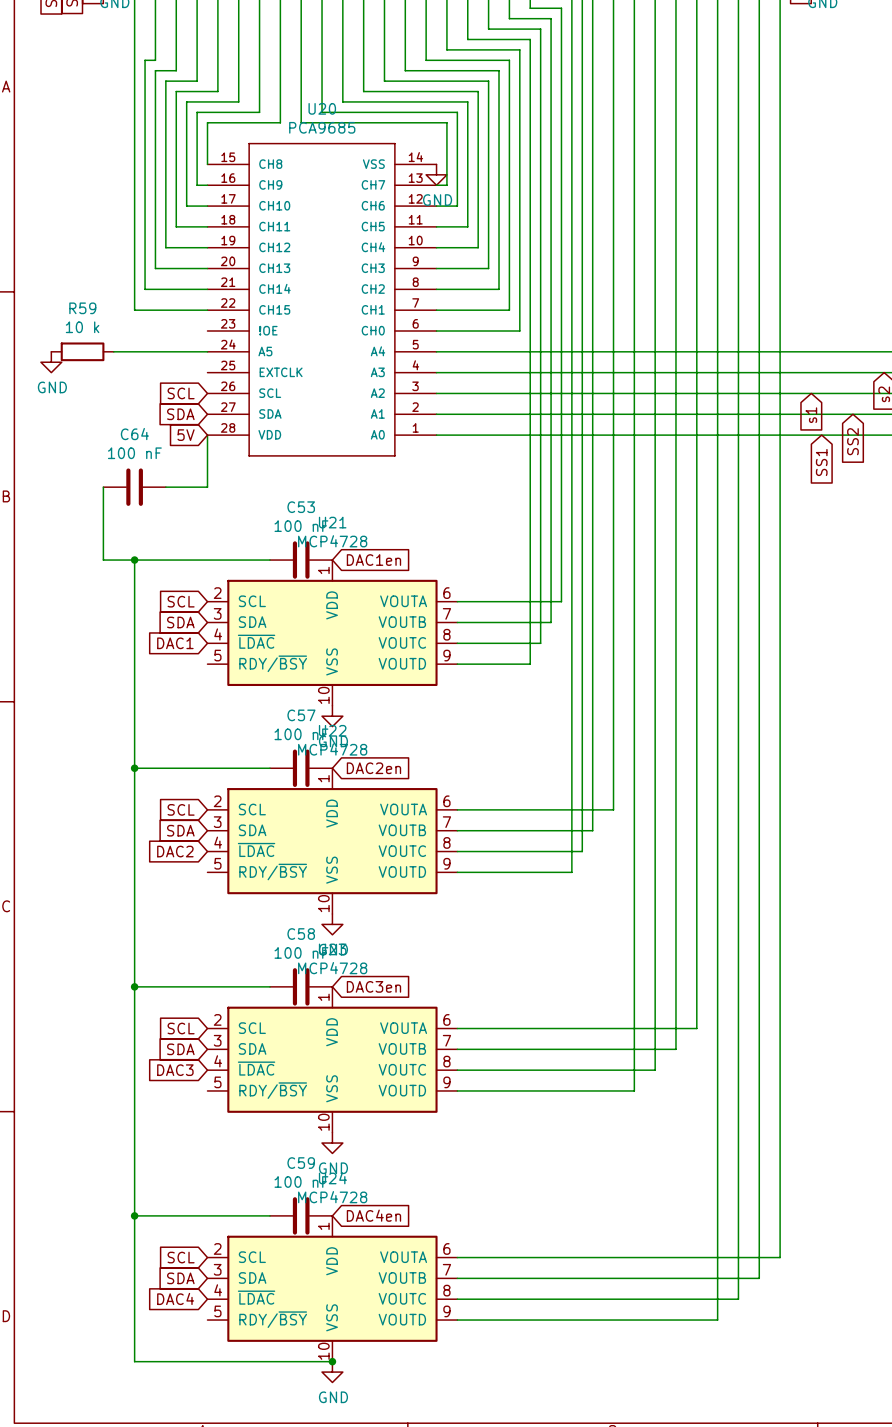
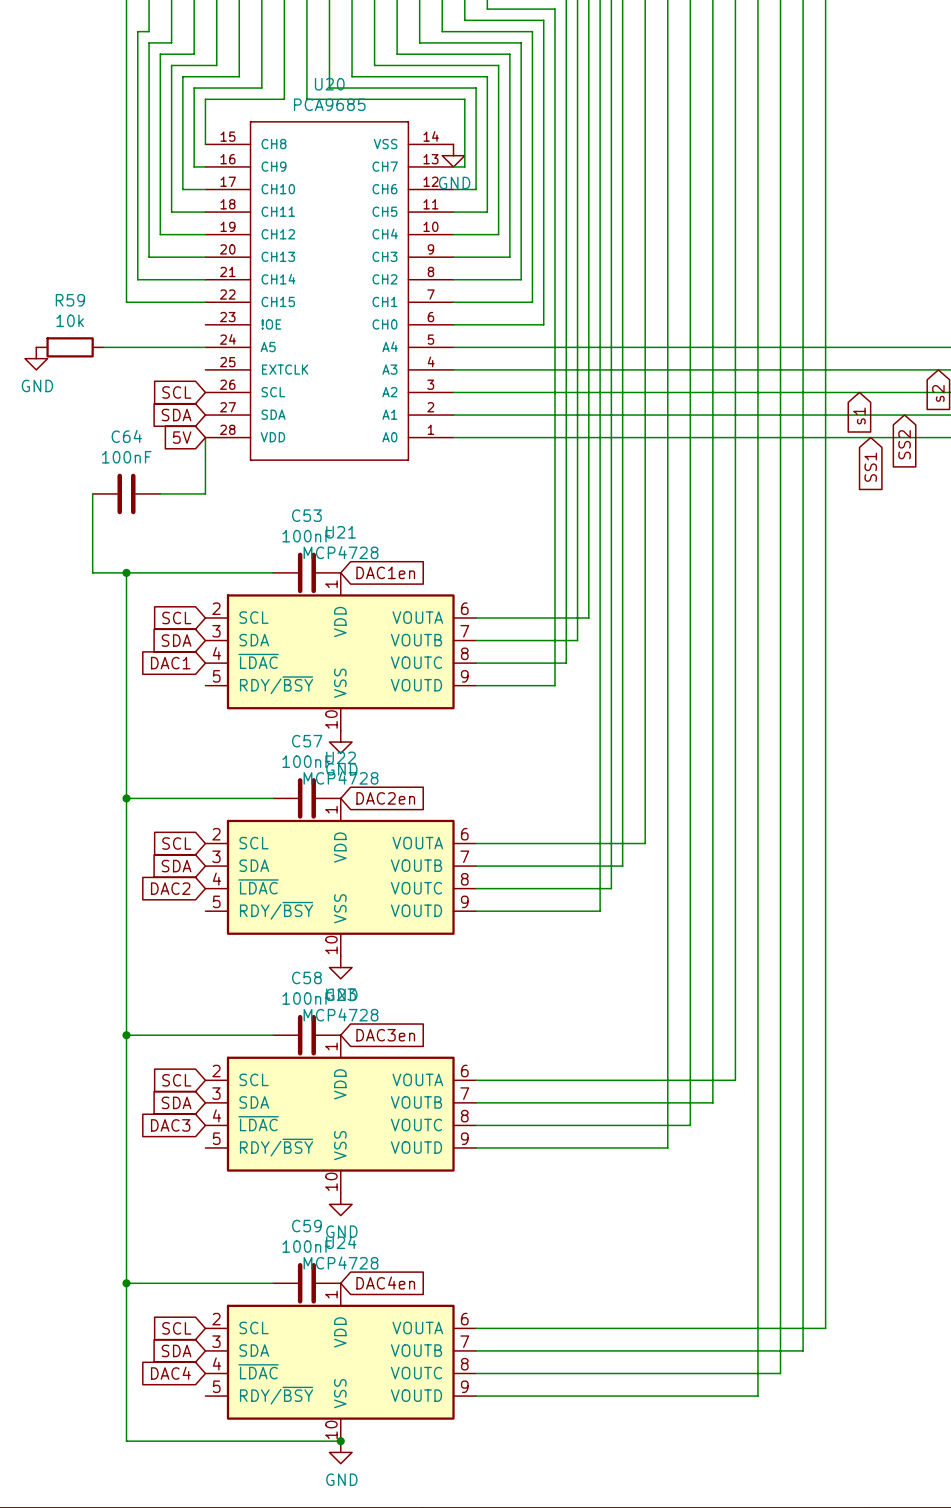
R59 value: 10 k (82, 327) -> 10k (70, 320)
C64 value: 100 nF (134, 453) -> 100nF (126, 457)
C53 value: 100 nF (301, 526) -> 100nF (307, 536)
C57 value: 100 nF (301, 734) -> 100nF (307, 761)
C58 value: 100 nF (301, 952) -> 100nF (307, 998)
C59 value: 100 nF (301, 1182) -> 100nF (307, 1246)

